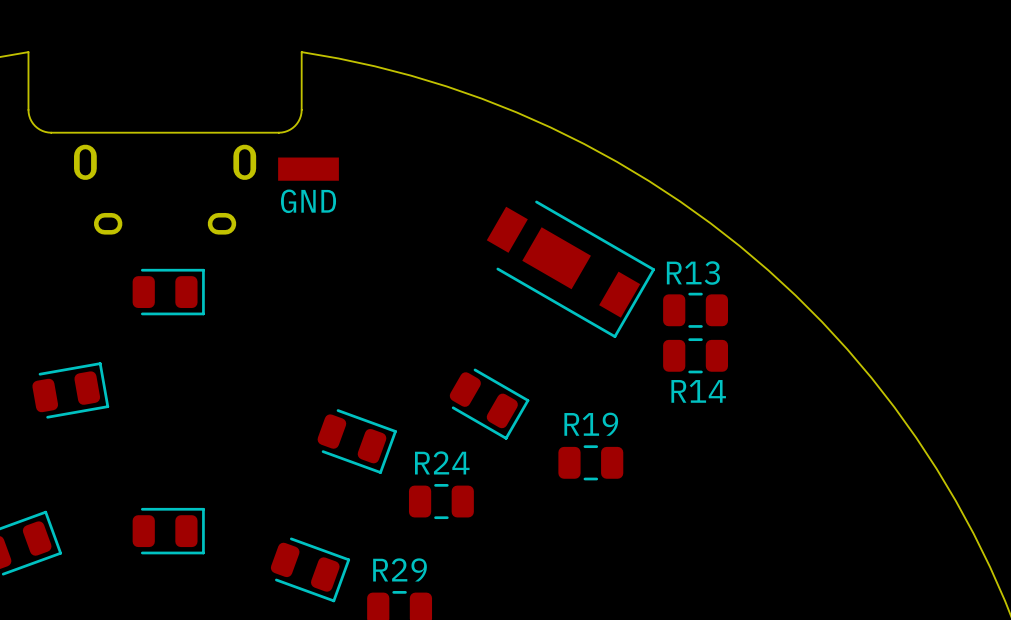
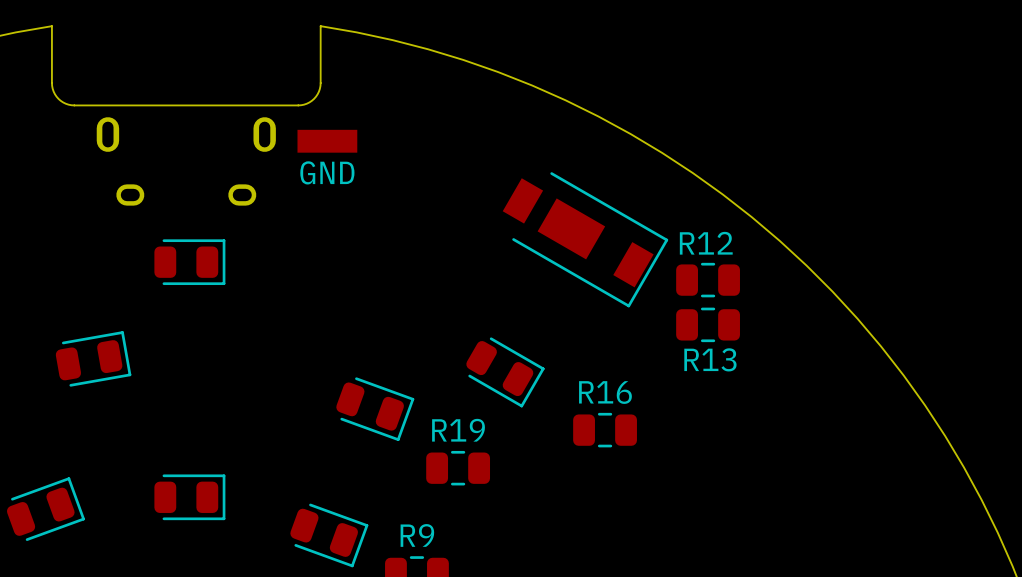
R13 name: R13 (693, 273) -> R12 (706, 243)
R14 name: R14 (698, 391) -> R13 (710, 359)
R19 name: R19 (591, 424) -> R16 (605, 392)
R24 name: R24 (442, 462) -> R19 (458, 430)
R29 name: R29 (400, 569) -> R9 (417, 535)

